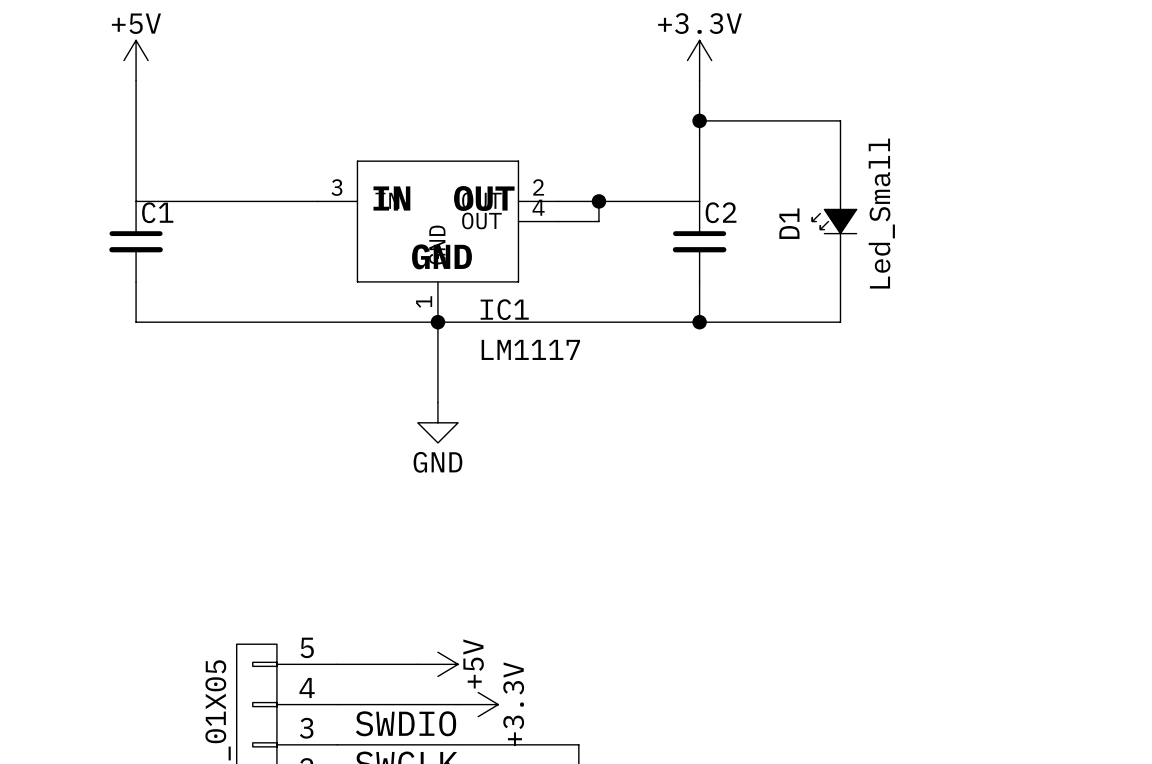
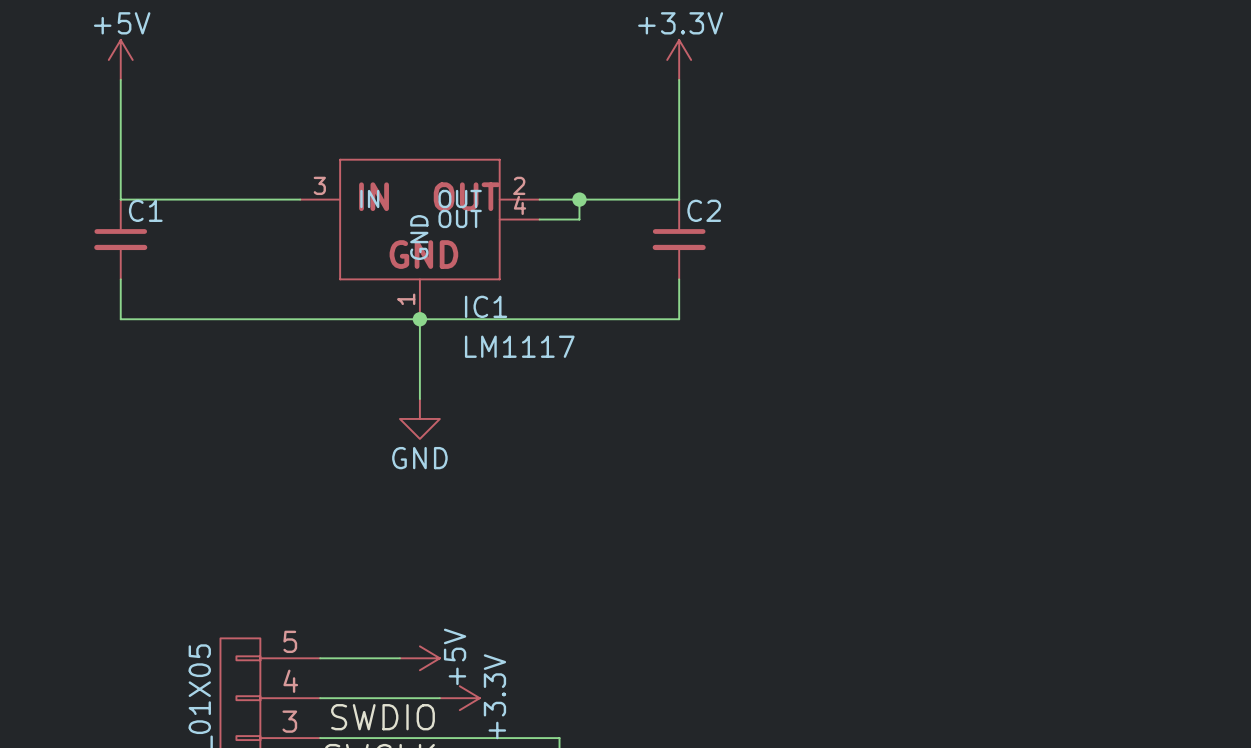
wire: (699, 120) (840, 120) (840, 181) -> none
junction: (699, 120) -> none
D1: Led_Small (834, 221) -> none
wire: (840, 261) (840, 322) (699, 322) -> none
junction: (699, 322) -> none

